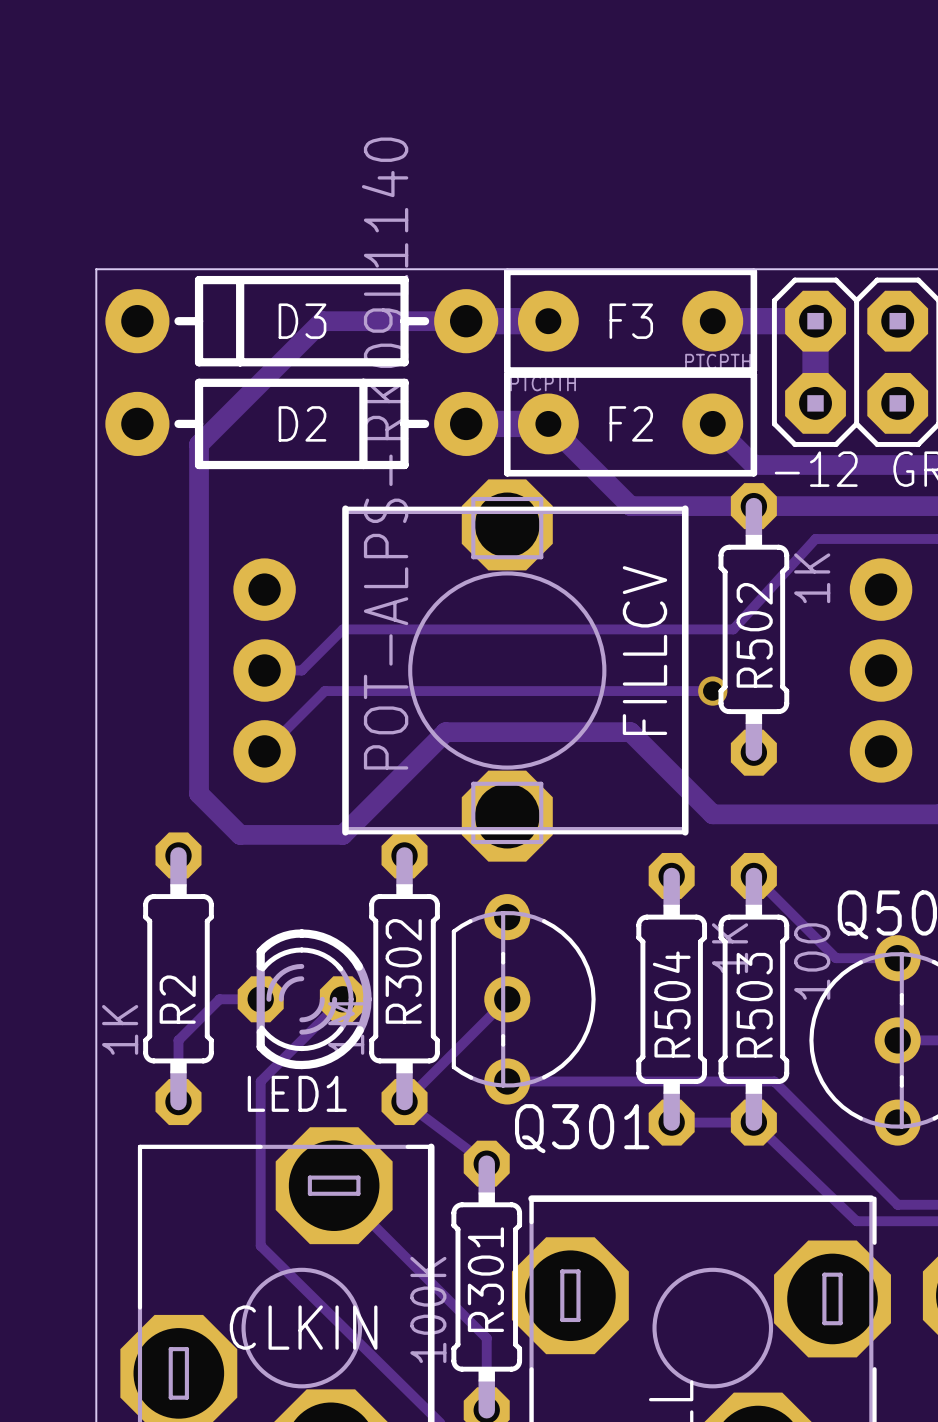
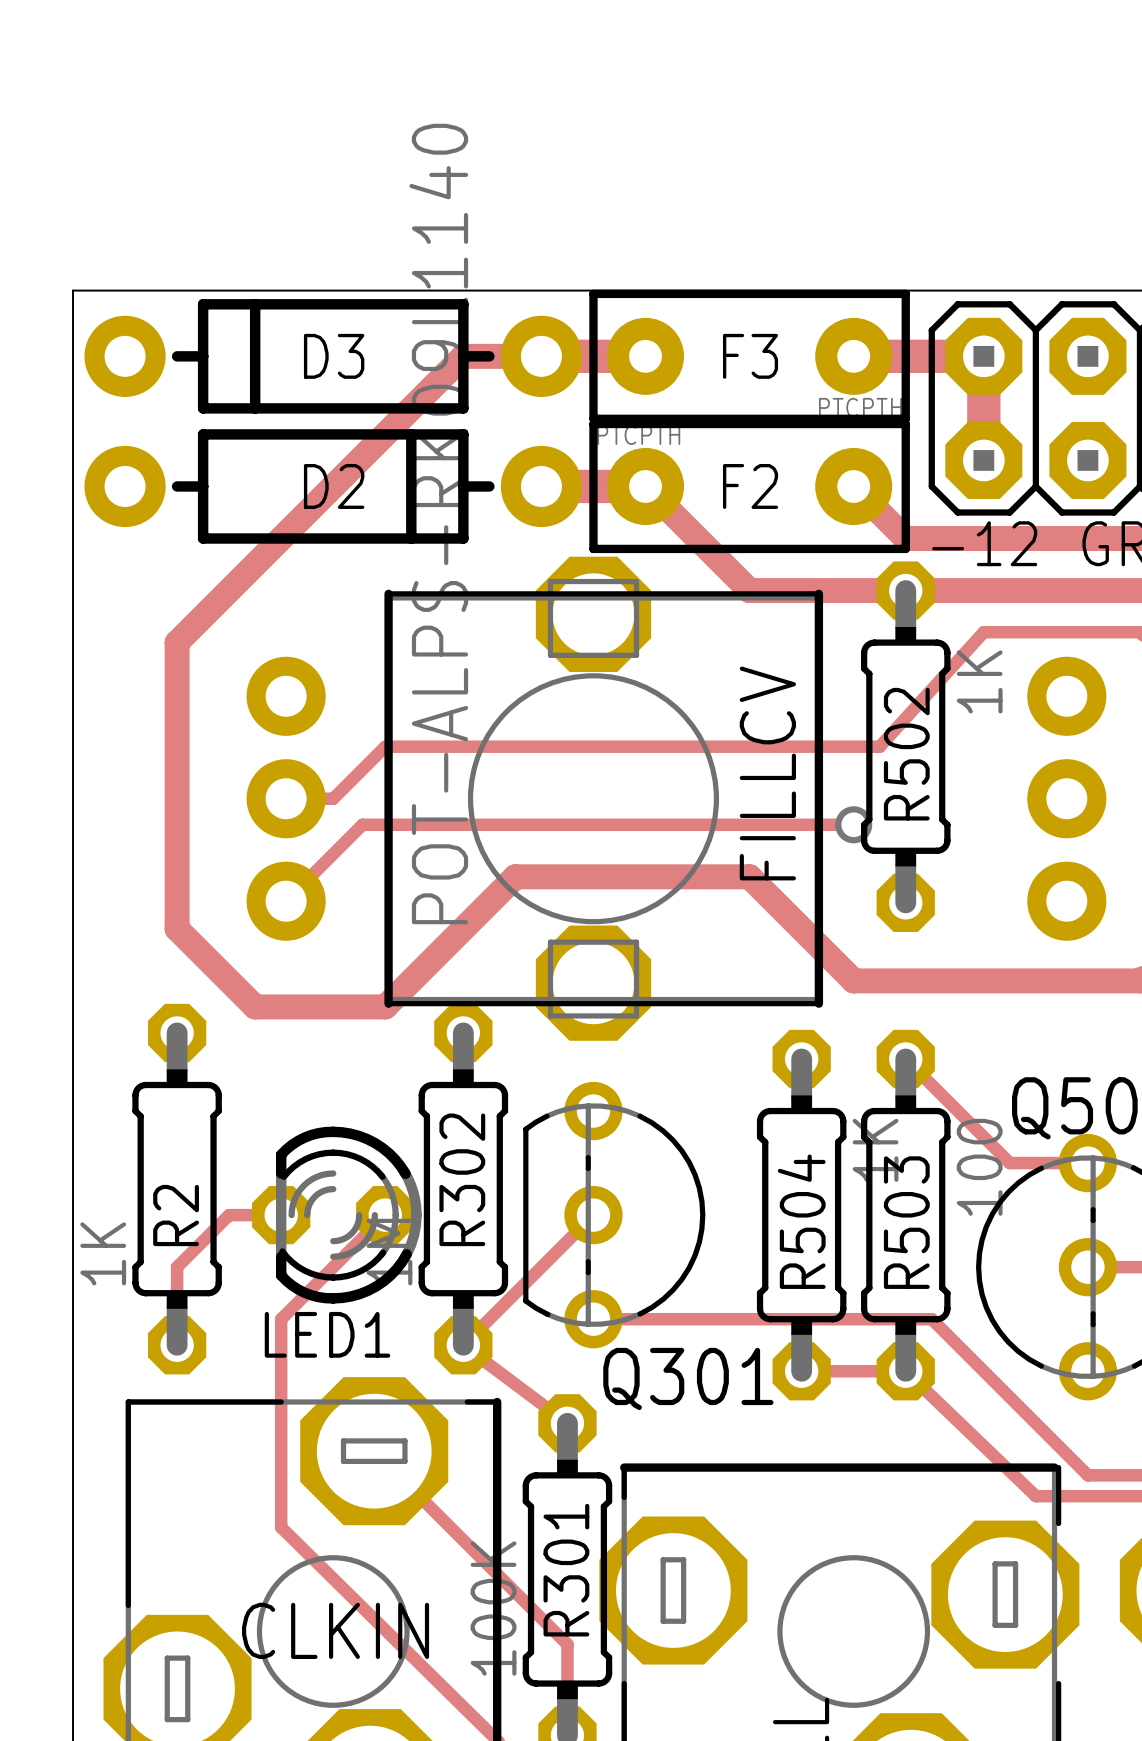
track: (404, 321) (322, 321) (199, 444) (199, 793) -> (463, 356) (177, 642) (177, 928) (203, 954)

